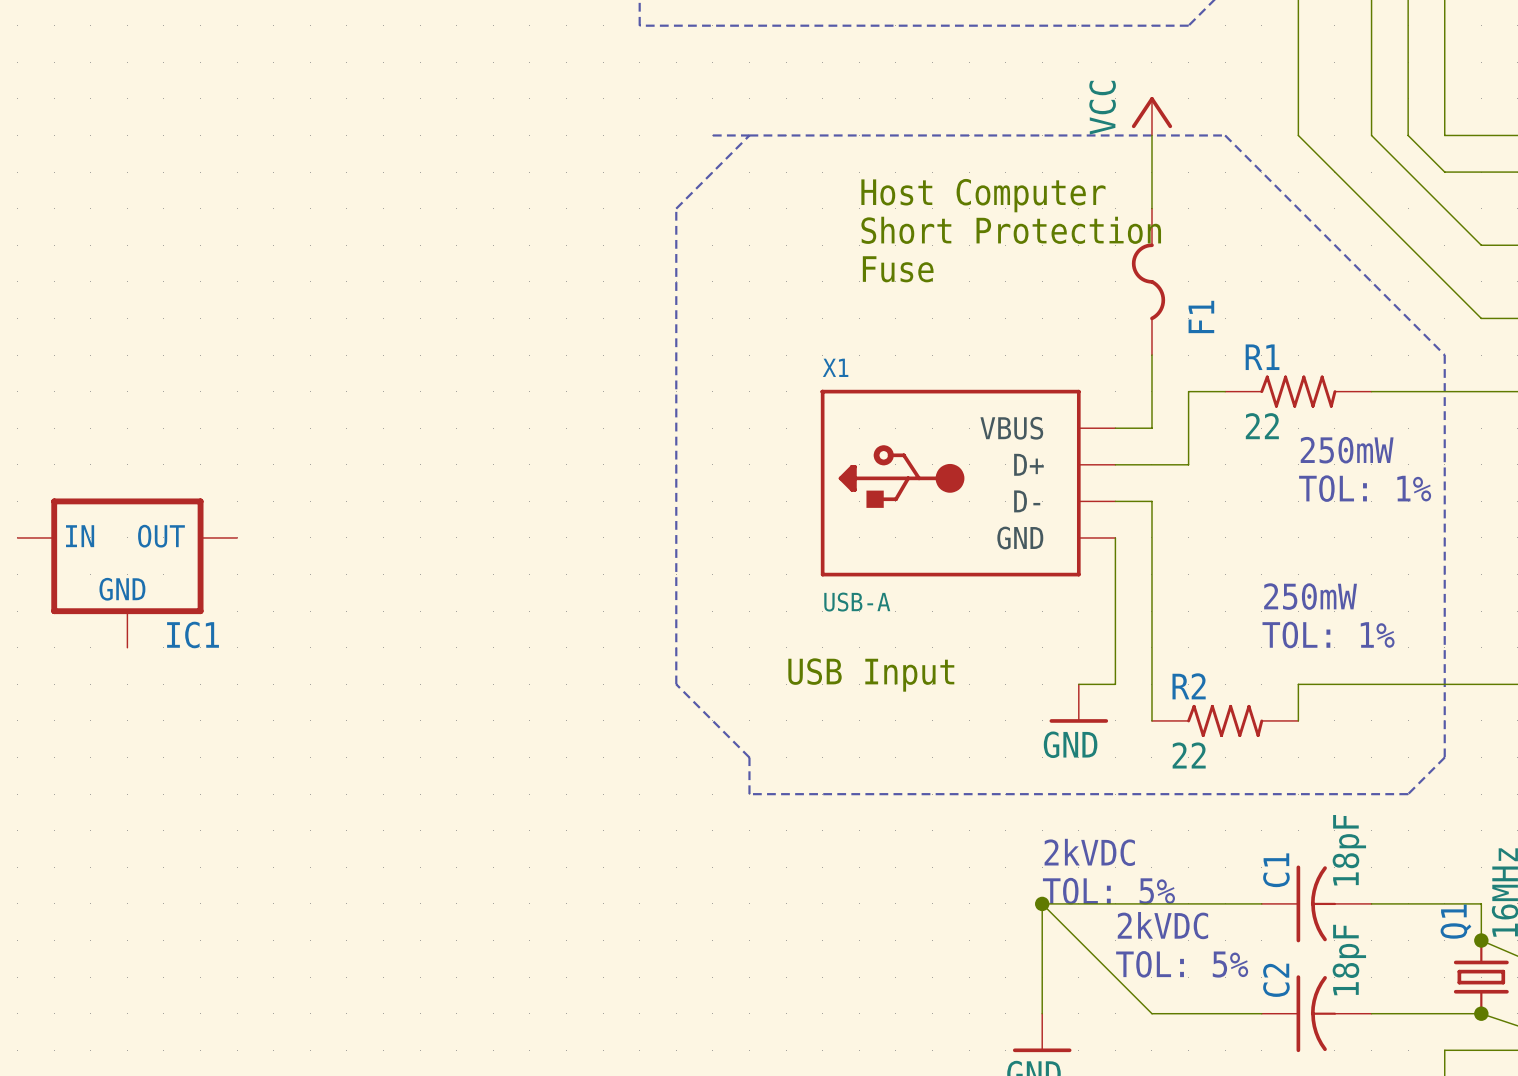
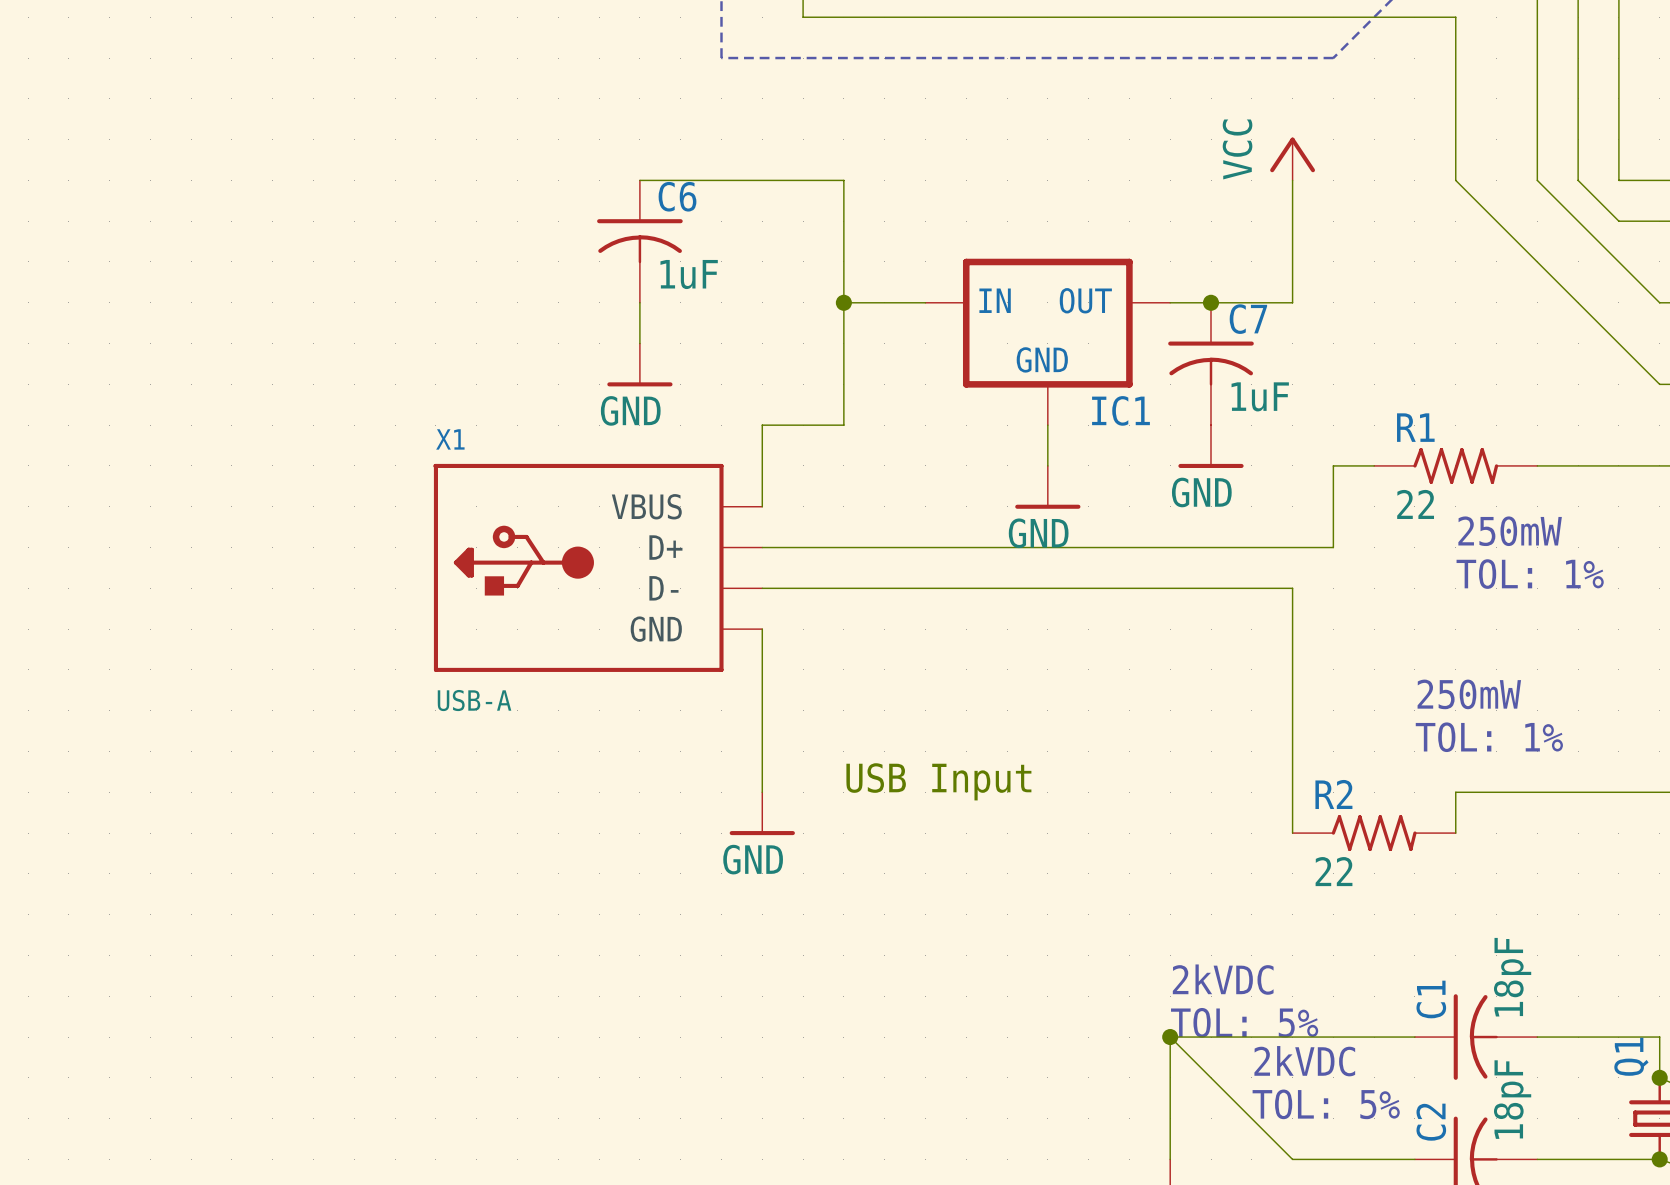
wire: none -> (639, 180) (843, 180) (843, 425) (762, 425) (762, 506)
line: (712, 135) (1225, 135) (1444, 355) (1444, 757) (1408, 794) (749, 794) (749, 757) (676, 684) (676, 208) (749, 135) -> none
C6: none -> 1uF (639, 241)
text: Host Computer (983, 195) -> none
wire: none -> (1292, 261) (1292, 302) (1170, 302)
text: Short Protection (1011, 230) -> none
wire: none -> (639, 302) (639, 343)
wire: none -> (843, 302) (925, 302)
junction: none -> (843, 302)
junction: none -> (1211, 302)
text: Fuse (898, 269) -> none
F1: (1148, 281) -> none
C7: none -> 1uF (1211, 363)
power symbol: none -> GND (639, 364)
wire: none -> (1047, 425) (1047, 465)
wire: (1151, 355) (1151, 428) (1115, 428) -> none
power symbol: none -> GND (1211, 446)
power symbol: none -> GND (1047, 487)
wire: none -> (762, 547) (1251, 547)
X1 position: (967, 483) -> (597, 567)
wire: none -> (762, 588) (1251, 588)
wire: (1115, 537) (1115, 684) (1078, 684) -> none
IC1 position: (127, 573) -> (1047, 341)
text position: USB Input (871, 674) -> USB Input (938, 781)
power symbol: none -> GND (762, 813)
power symbol: GND (1078, 703) -> none

